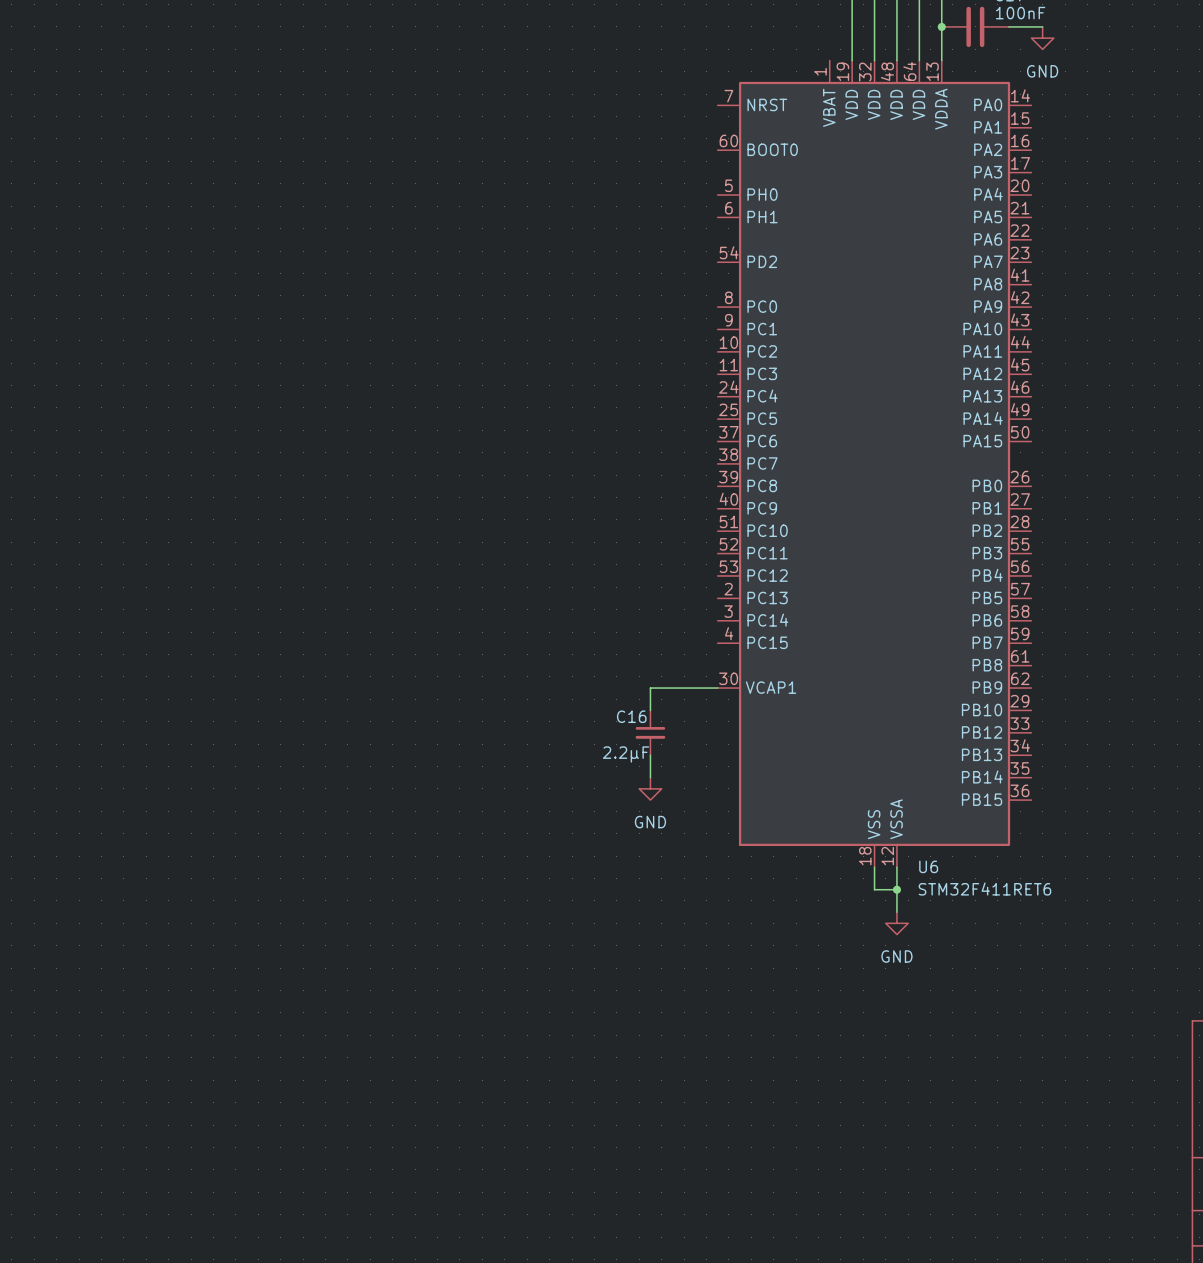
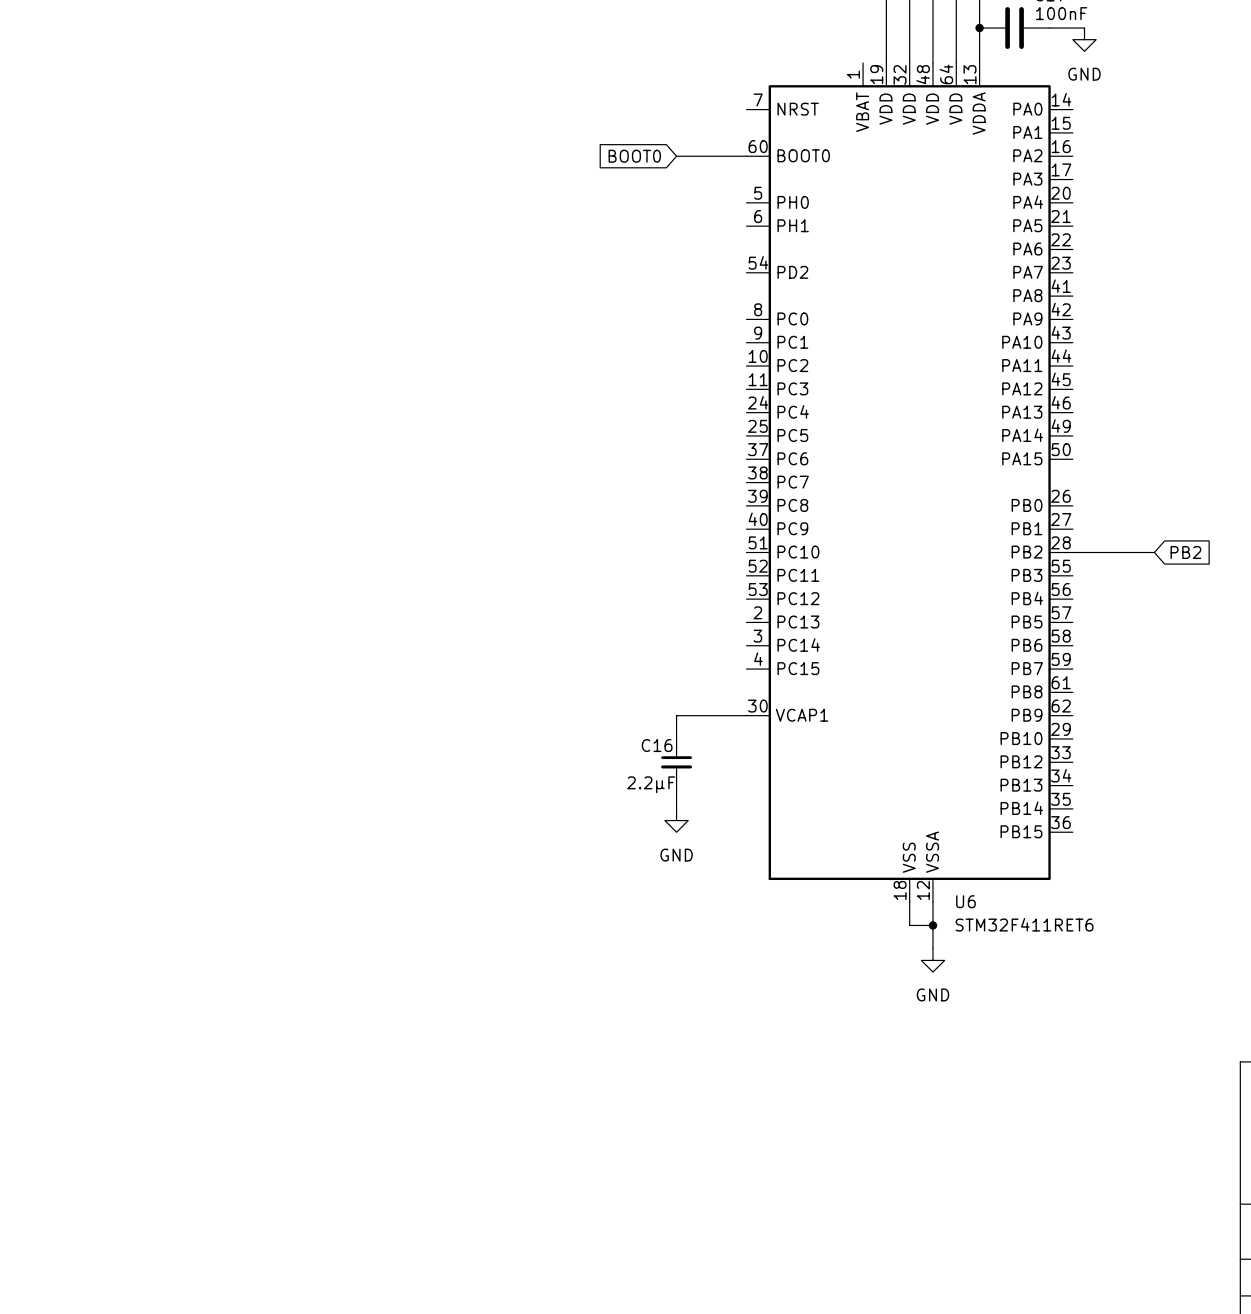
global label: none -> BOOT0 (634, 156)
wire: none -> (676, 156) (746, 156)
wire: none -> (1072, 552) (1154, 552)
global label: none -> PB2 (1185, 552)

